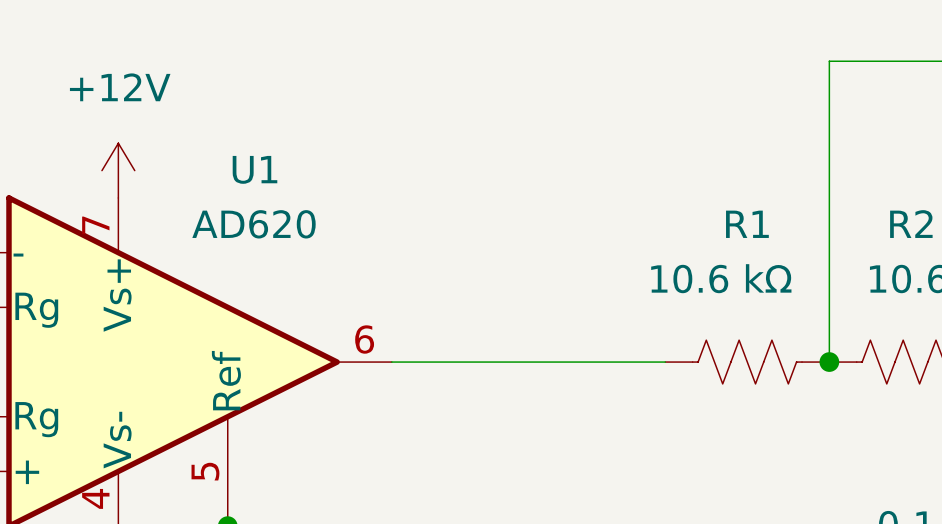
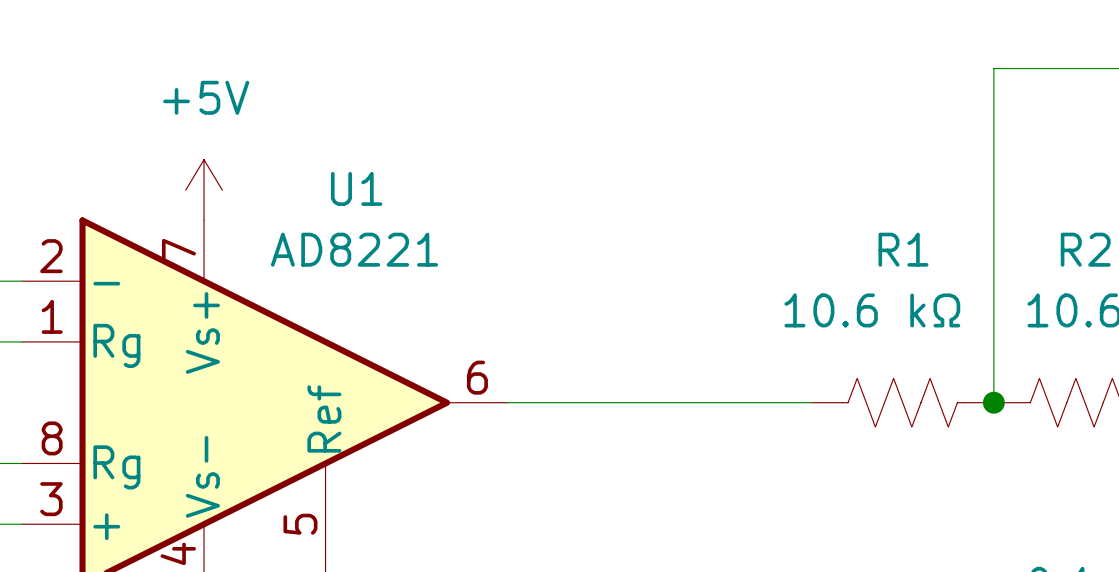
power symbol: +12V (118, 170) -> +5V (204, 190)
U1 value: AD620 (254, 224) -> AD8221 (354, 249)

